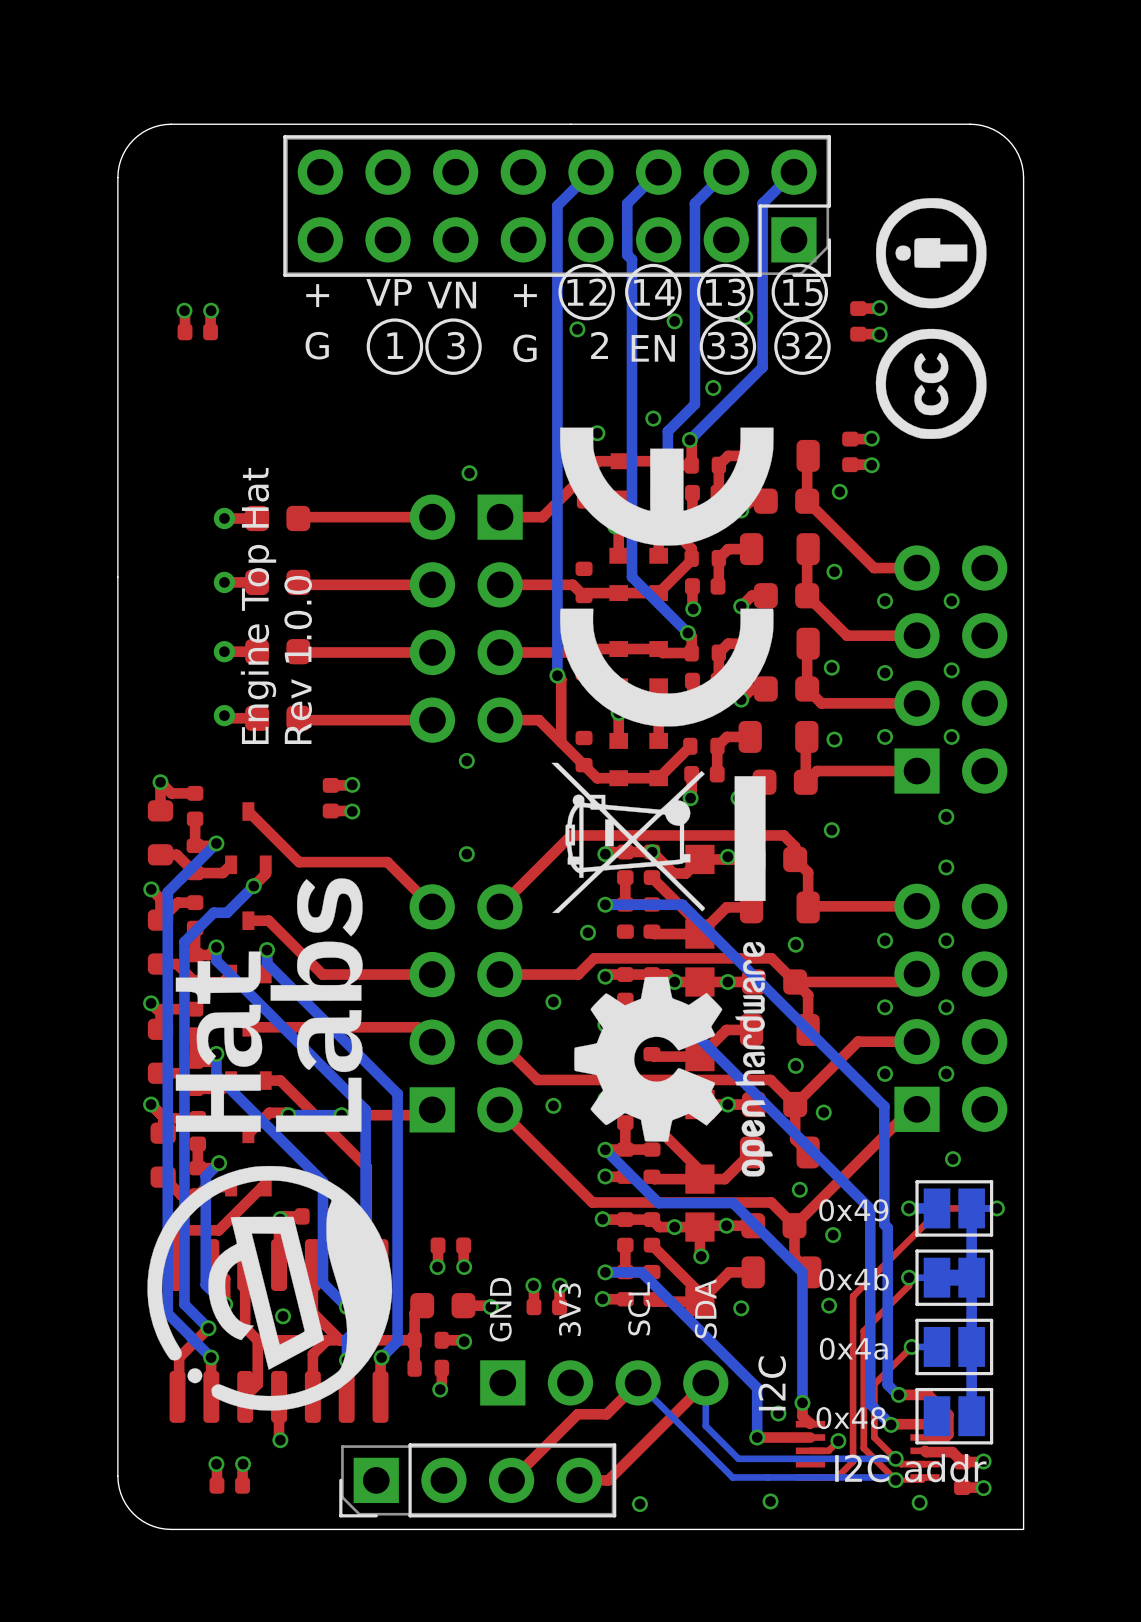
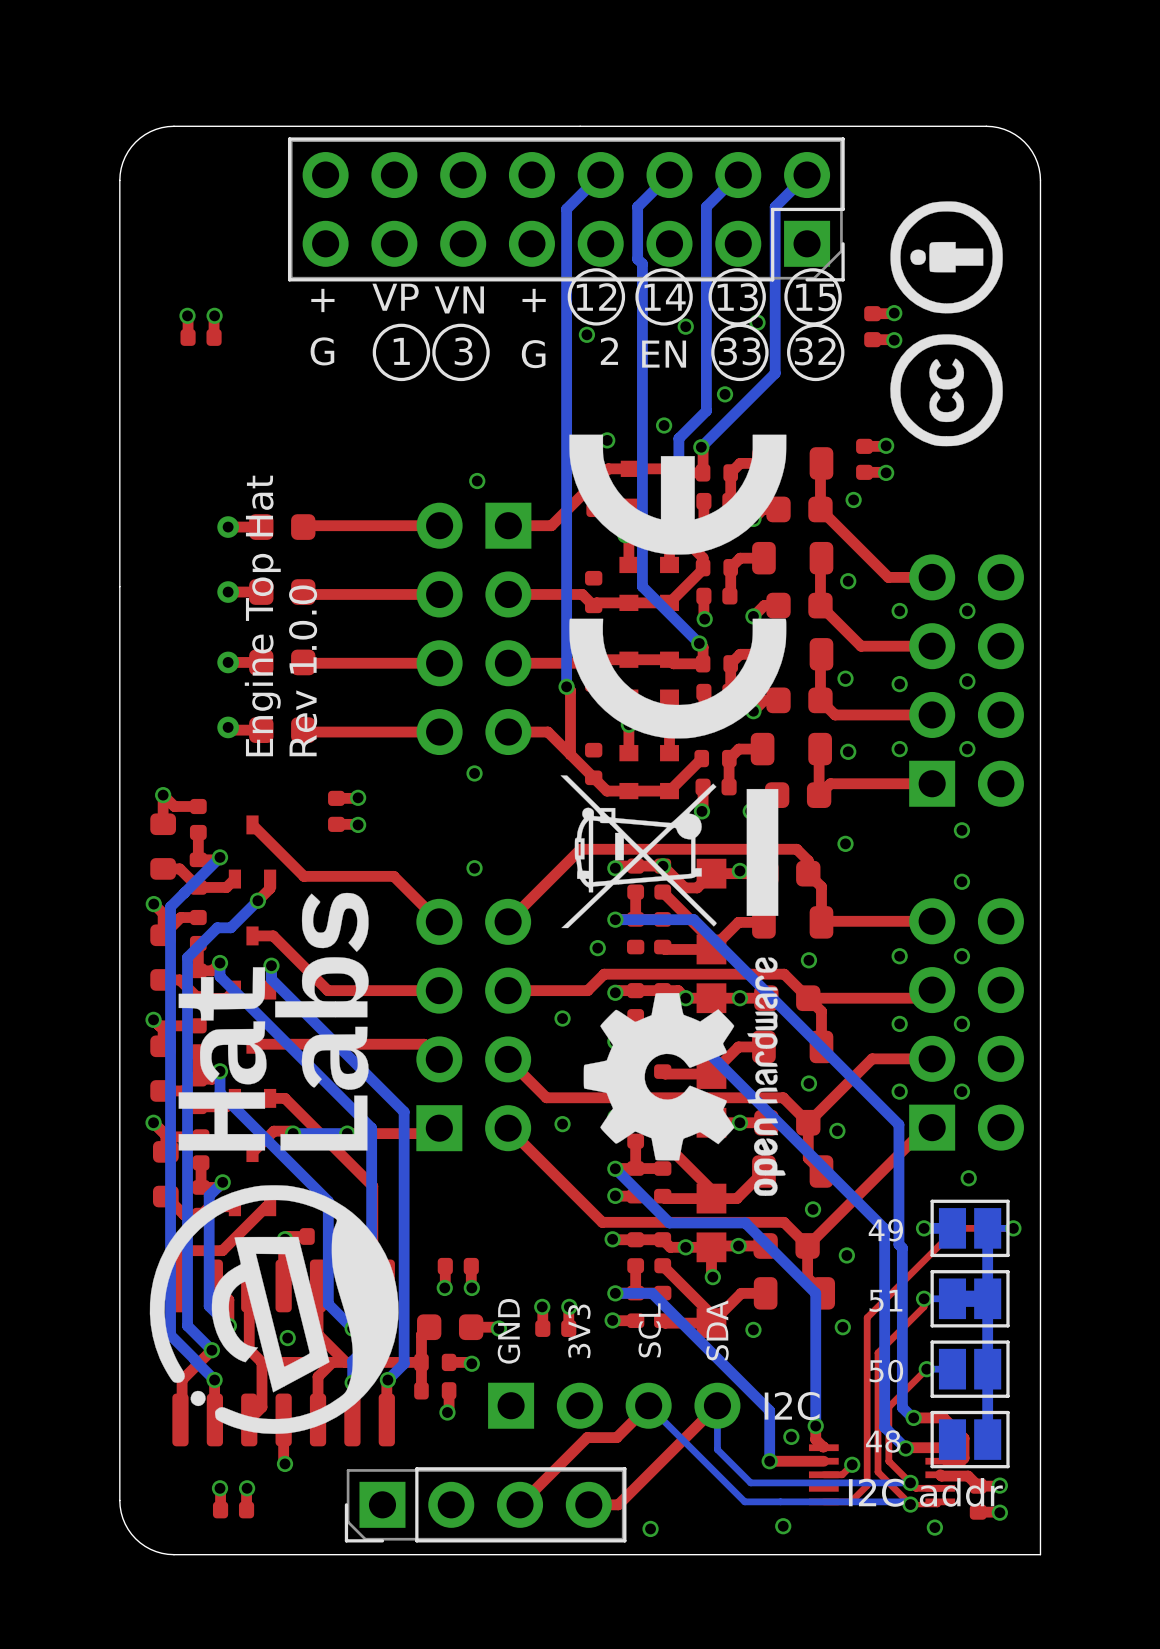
text: 0x49 (853, 1210) -> 49 (885, 1230)
text: 0x4b (854, 1279) -> 51 (885, 1300)
text: 0x4a (853, 1348) -> 50 (886, 1371)
text rotation: 0° (772, 1383) -> 90° clockwise (792, 1406)
text: 0x48 (851, 1418) -> 48 (883, 1441)

